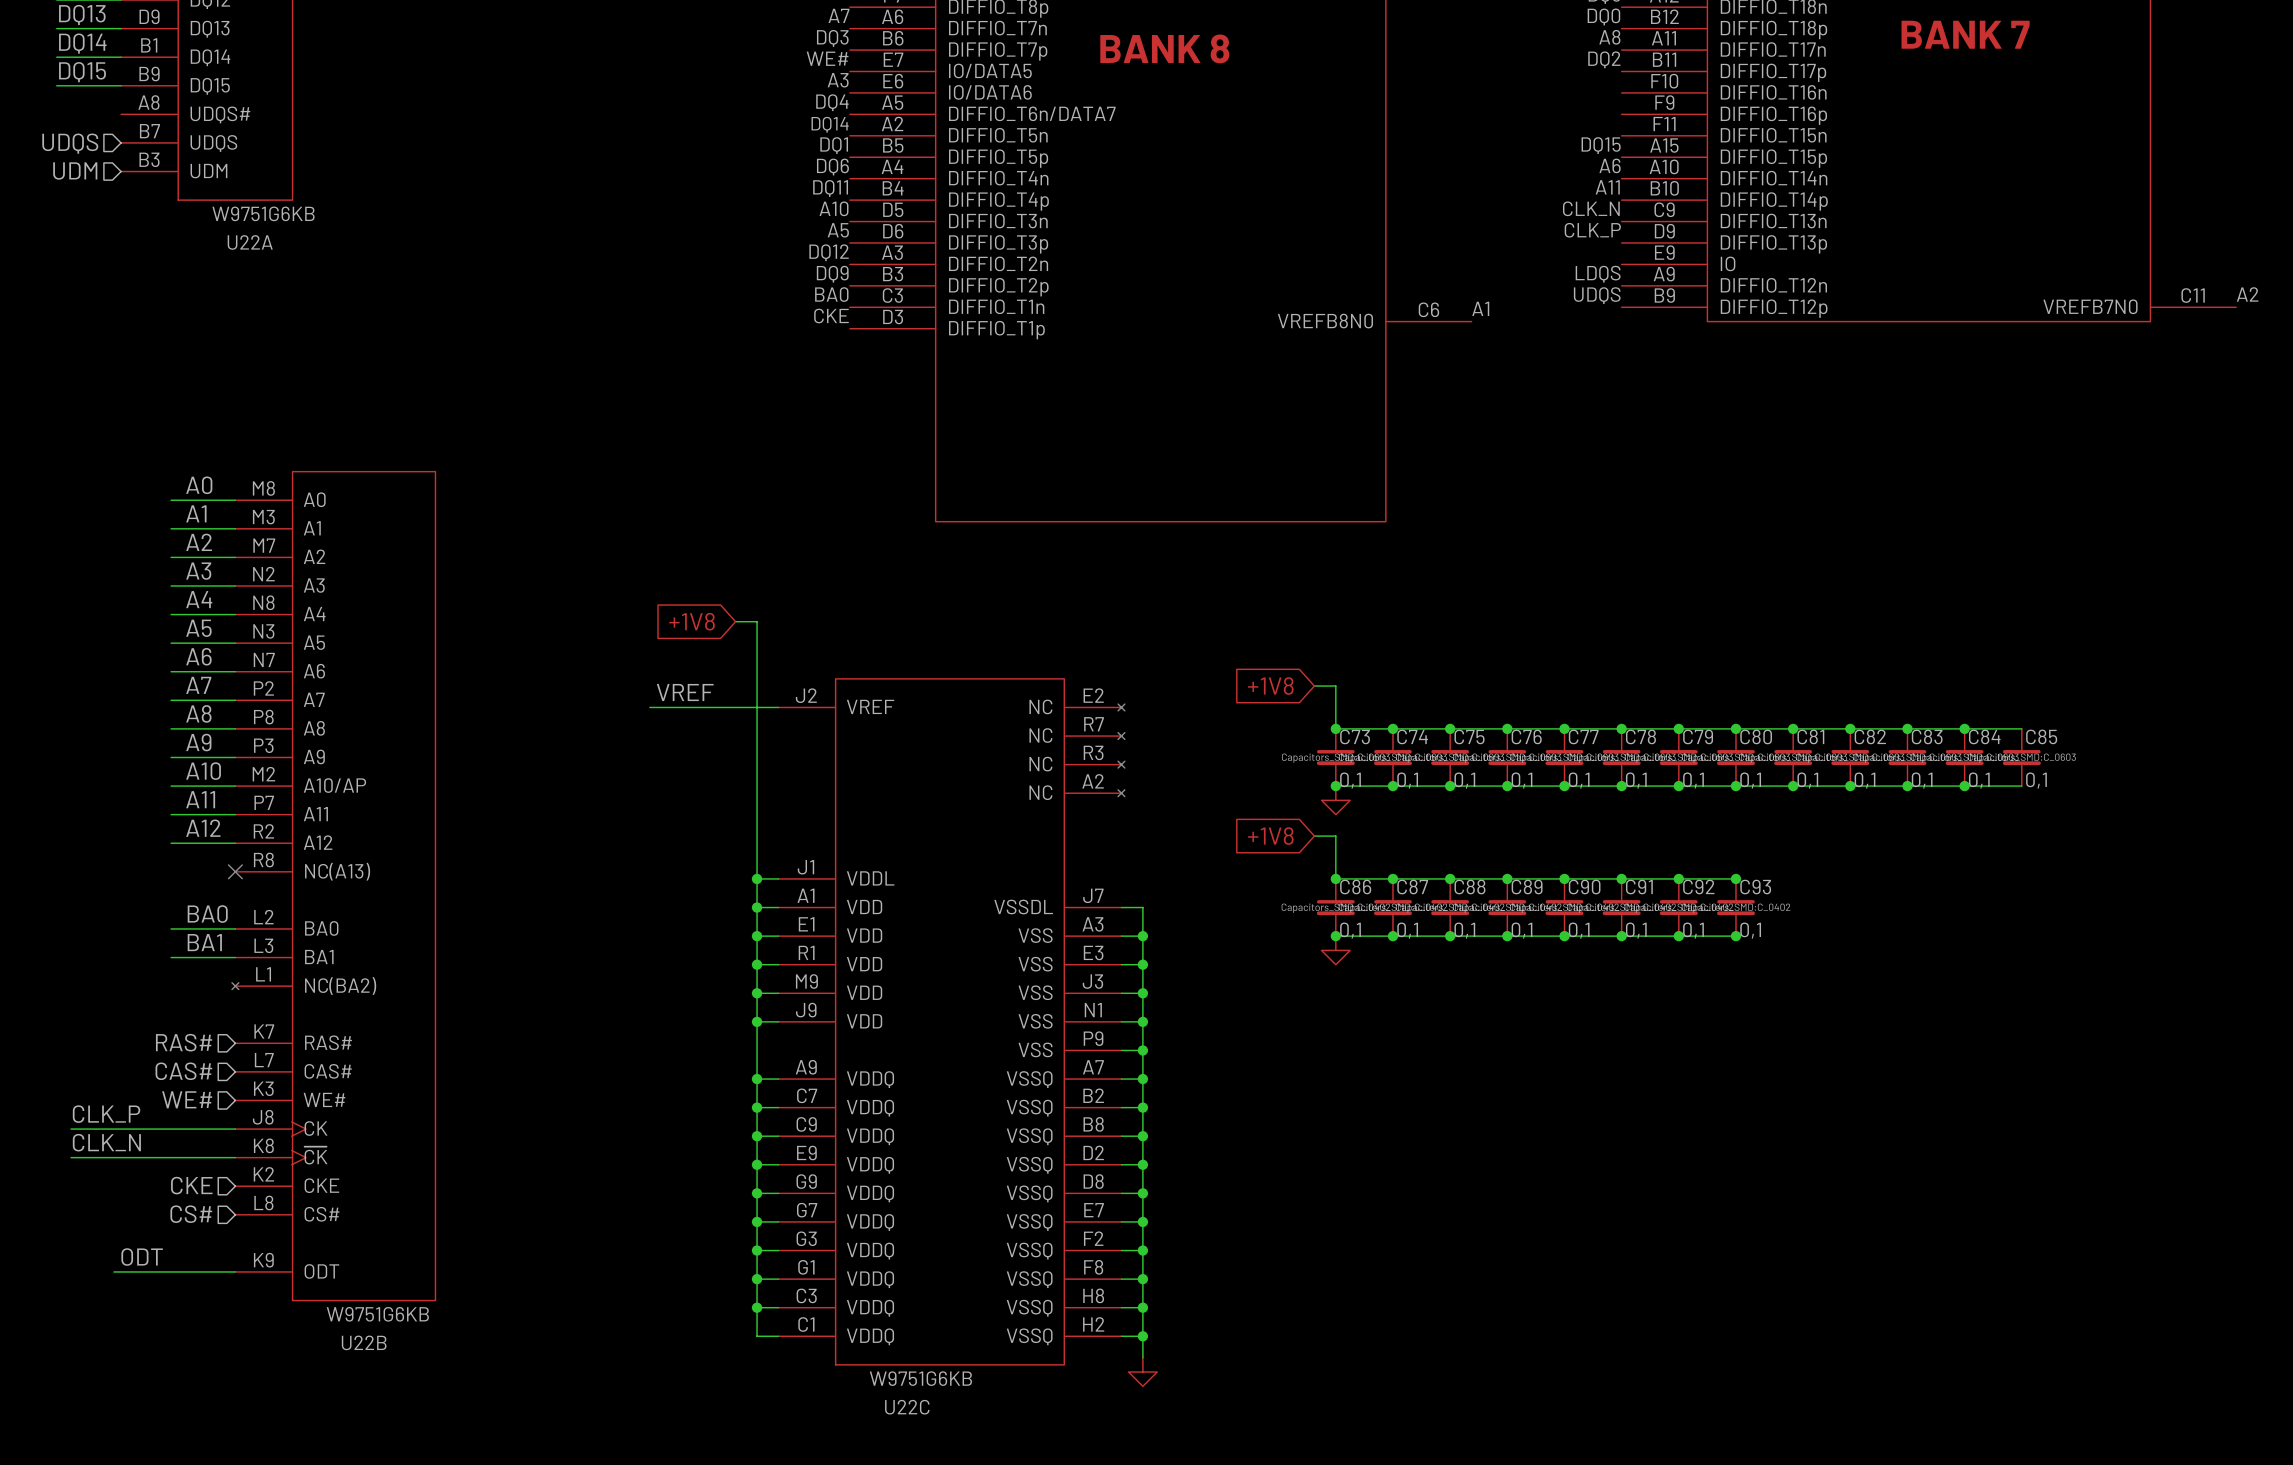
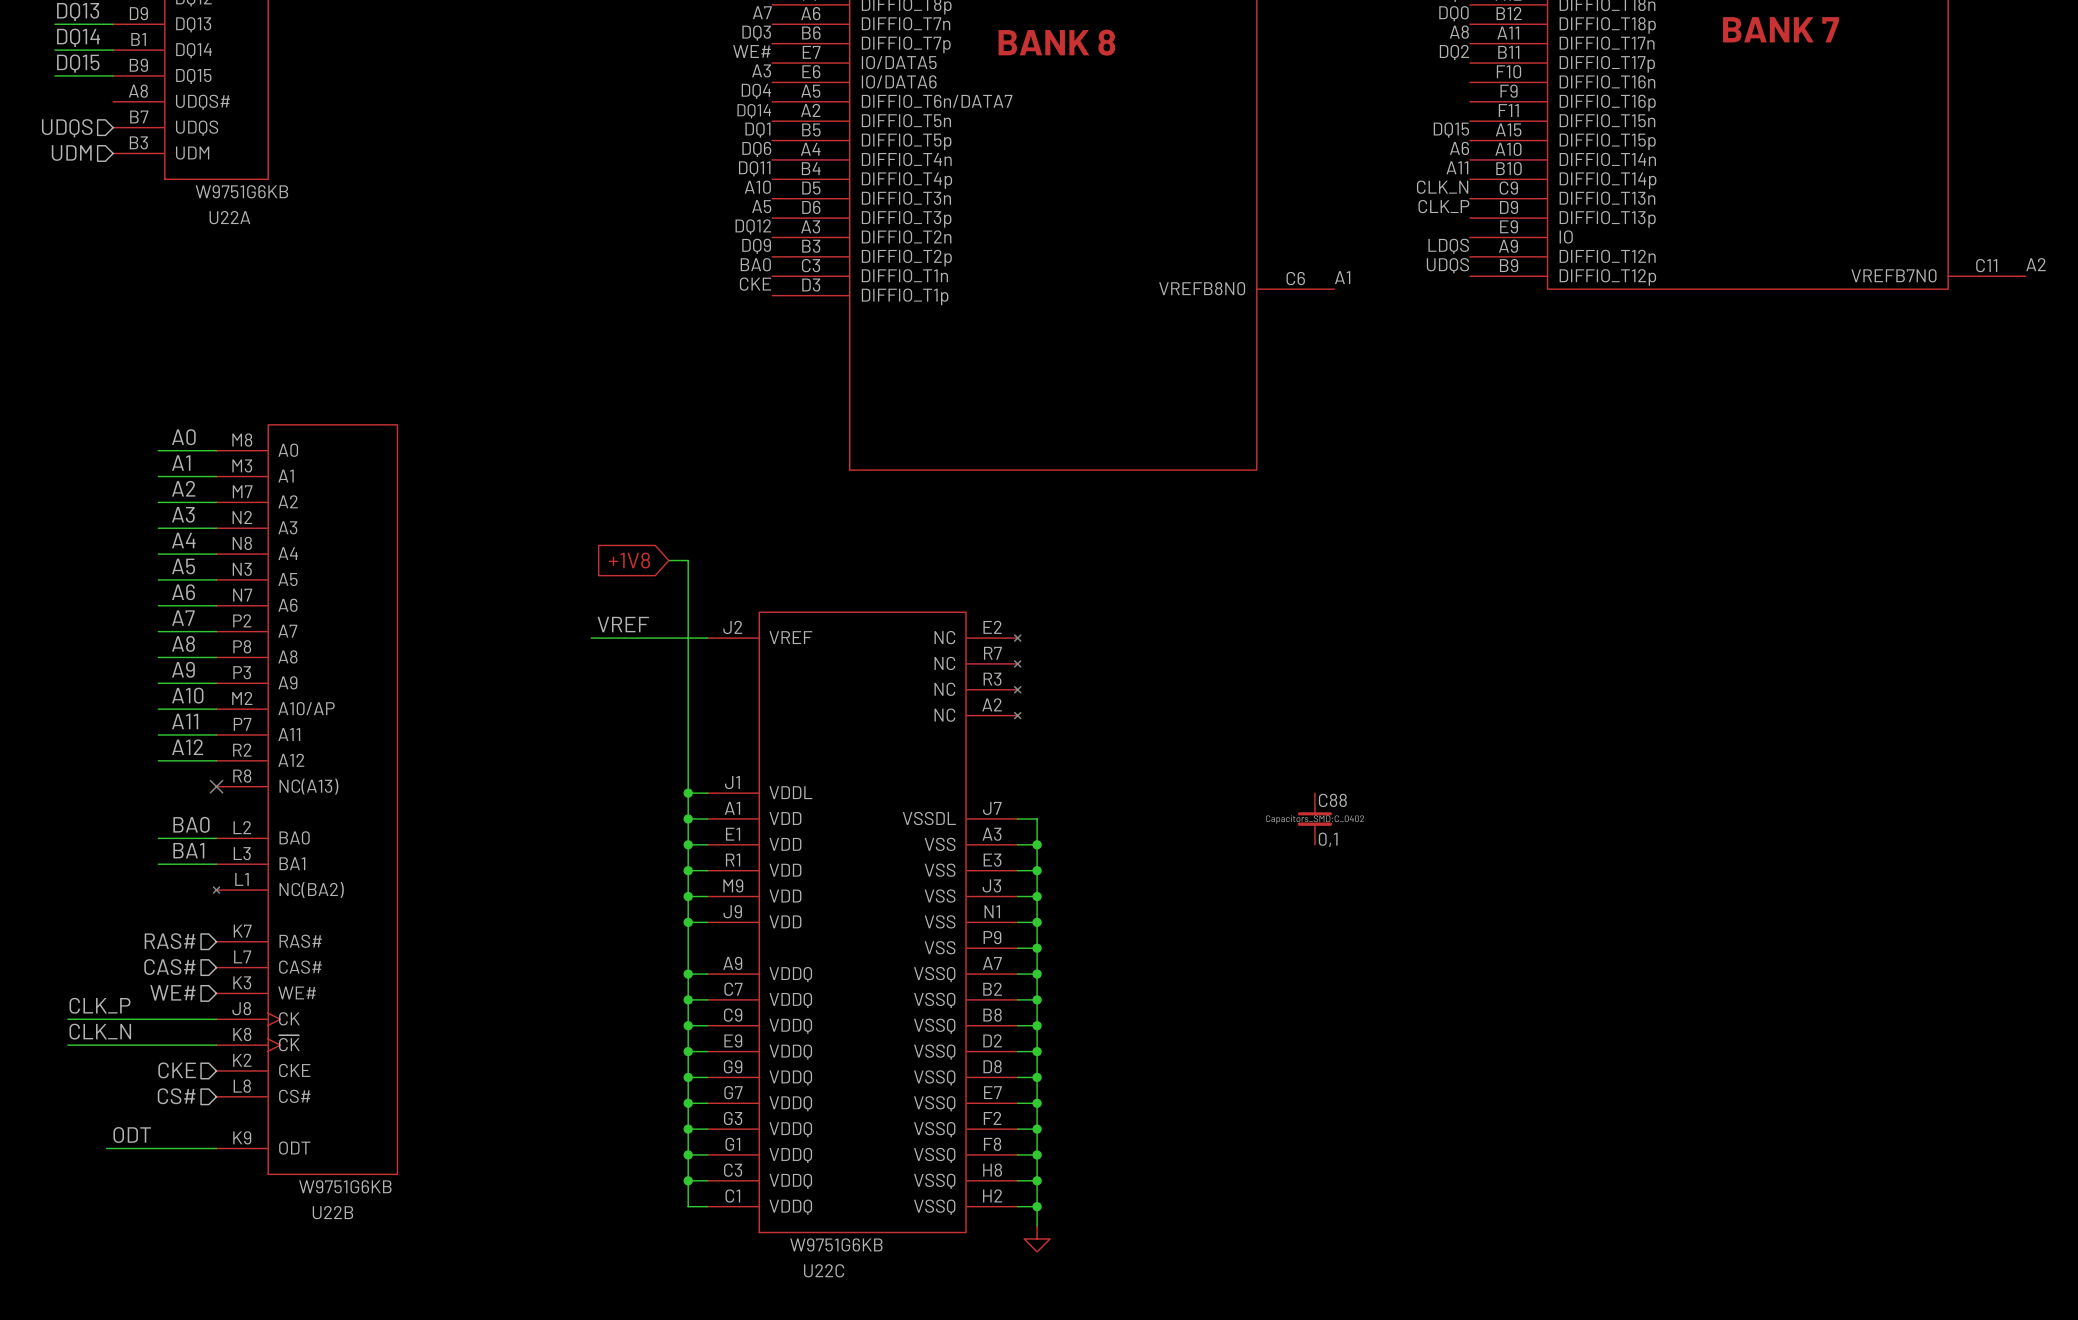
global label: +1V8 (1270, 686) -> none
wire: (1314, 686) (1335, 686) (1335, 728) (2021, 728) -> none
junction: (1335, 728) -> none
junction: (1392, 728) -> none
junction: (1450, 728) -> none
junction: (1507, 728) -> none
junction: (1564, 728) -> none
junction: (1621, 728) -> none
junction: (1678, 728) -> none
junction: (1735, 728) -> none
junction: (1793, 728) -> none
junction: (1850, 728) -> none
junction: (1907, 728) -> none
junction: (1964, 728) -> none
C73: 0,1 (1335, 757) -> none
C74: 0,1 (1392, 757) -> none
C75: 0,1 (1450, 757) -> none
C76: 0,1 (1507, 757) -> none
C77: 0,1 (1564, 757) -> none
C78: 0,1 (1621, 757) -> none
C79: 0,1 (1678, 757) -> none
C80: 0,1 (1735, 757) -> none
C81: 0,1 (1793, 757) -> none
C82: 0,1 (1850, 757) -> none
C83: 0,1 (1907, 757) -> none
C84: 0,1 (1964, 757) -> none
C85: 0,1 (2021, 757) -> none
wire: (1335, 786) (2021, 786) -> none
junction: (1335, 786) -> none
junction: (1392, 786) -> none
junction: (1450, 786) -> none
junction: (1507, 786) -> none
junction: (1564, 786) -> none
junction: (1621, 786) -> none
junction: (1678, 786) -> none
junction: (1735, 786) -> none
junction: (1793, 786) -> none
junction: (1850, 786) -> none
junction: (1907, 786) -> none
junction: (1964, 786) -> none
power symbol: (1335, 800) -> none
global label: +1V8 (1270, 836) -> none
wire: (1314, 836) (1335, 836) (1335, 878) (1735, 878) -> none
junction: (1335, 878) -> none
junction: (1392, 878) -> none
junction: (1450, 878) -> none
junction: (1507, 878) -> none
junction: (1564, 878) -> none
junction: (1621, 878) -> none
junction: (1678, 878) -> none
junction: (1735, 878) -> none
C86: 0,1 (1335, 907) -> none
C87: 0,1 (1392, 907) -> none
C89: 0,1 (1507, 907) -> none
C90: 0,1 (1564, 907) -> none
C91: 0,1 (1621, 907) -> none
C92: 0,1 (1678, 907) -> none
C93: 0,1 (1735, 907) -> none
wire: (1335, 936) (1735, 936) -> none
junction: (1335, 936) -> none
junction: (1392, 936) -> none
junction: (1450, 936) -> none
junction: (1507, 936) -> none
junction: (1564, 936) -> none
junction: (1621, 936) -> none
junction: (1678, 936) -> none
junction: (1735, 936) -> none
power symbol: (1335, 950) -> none

